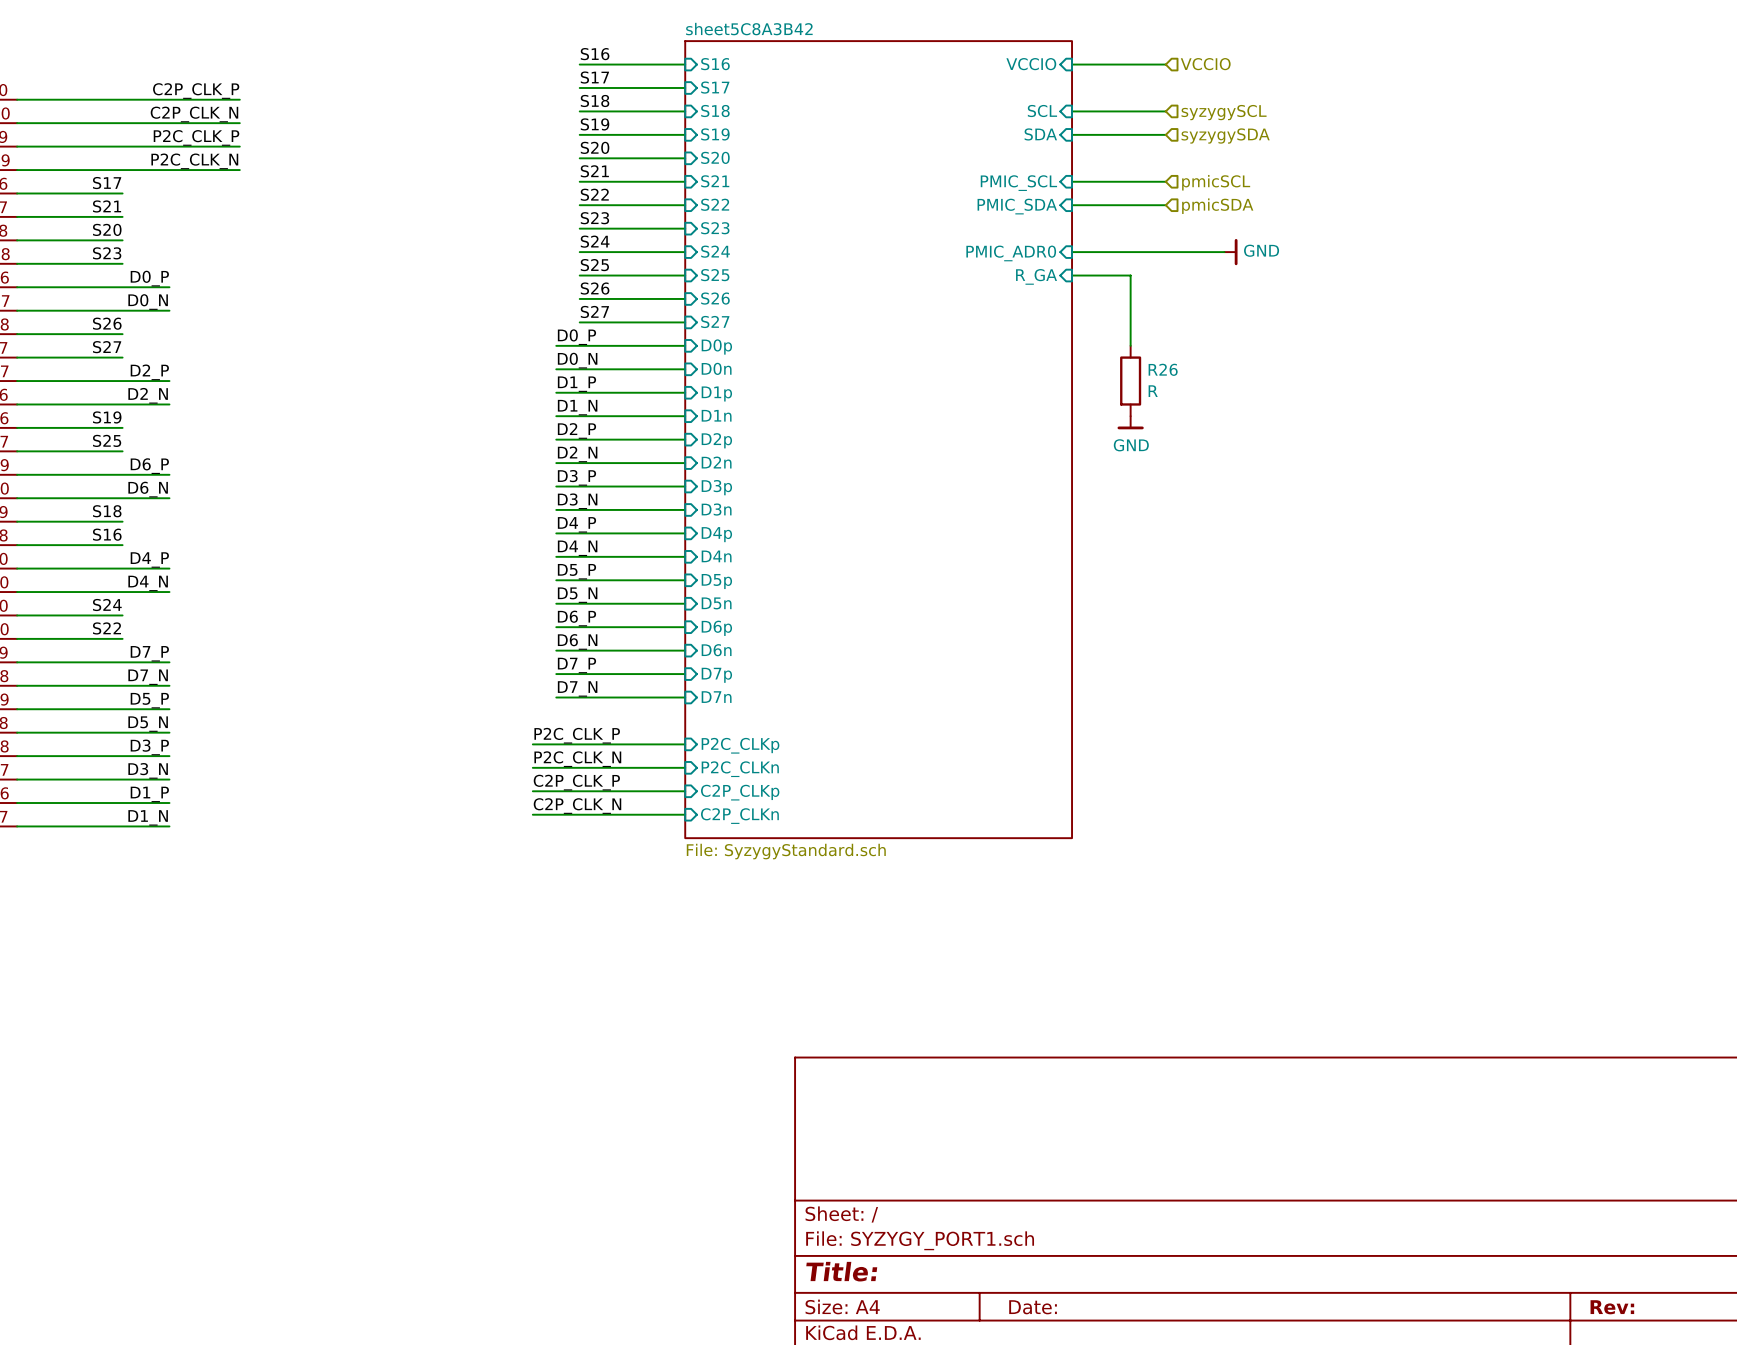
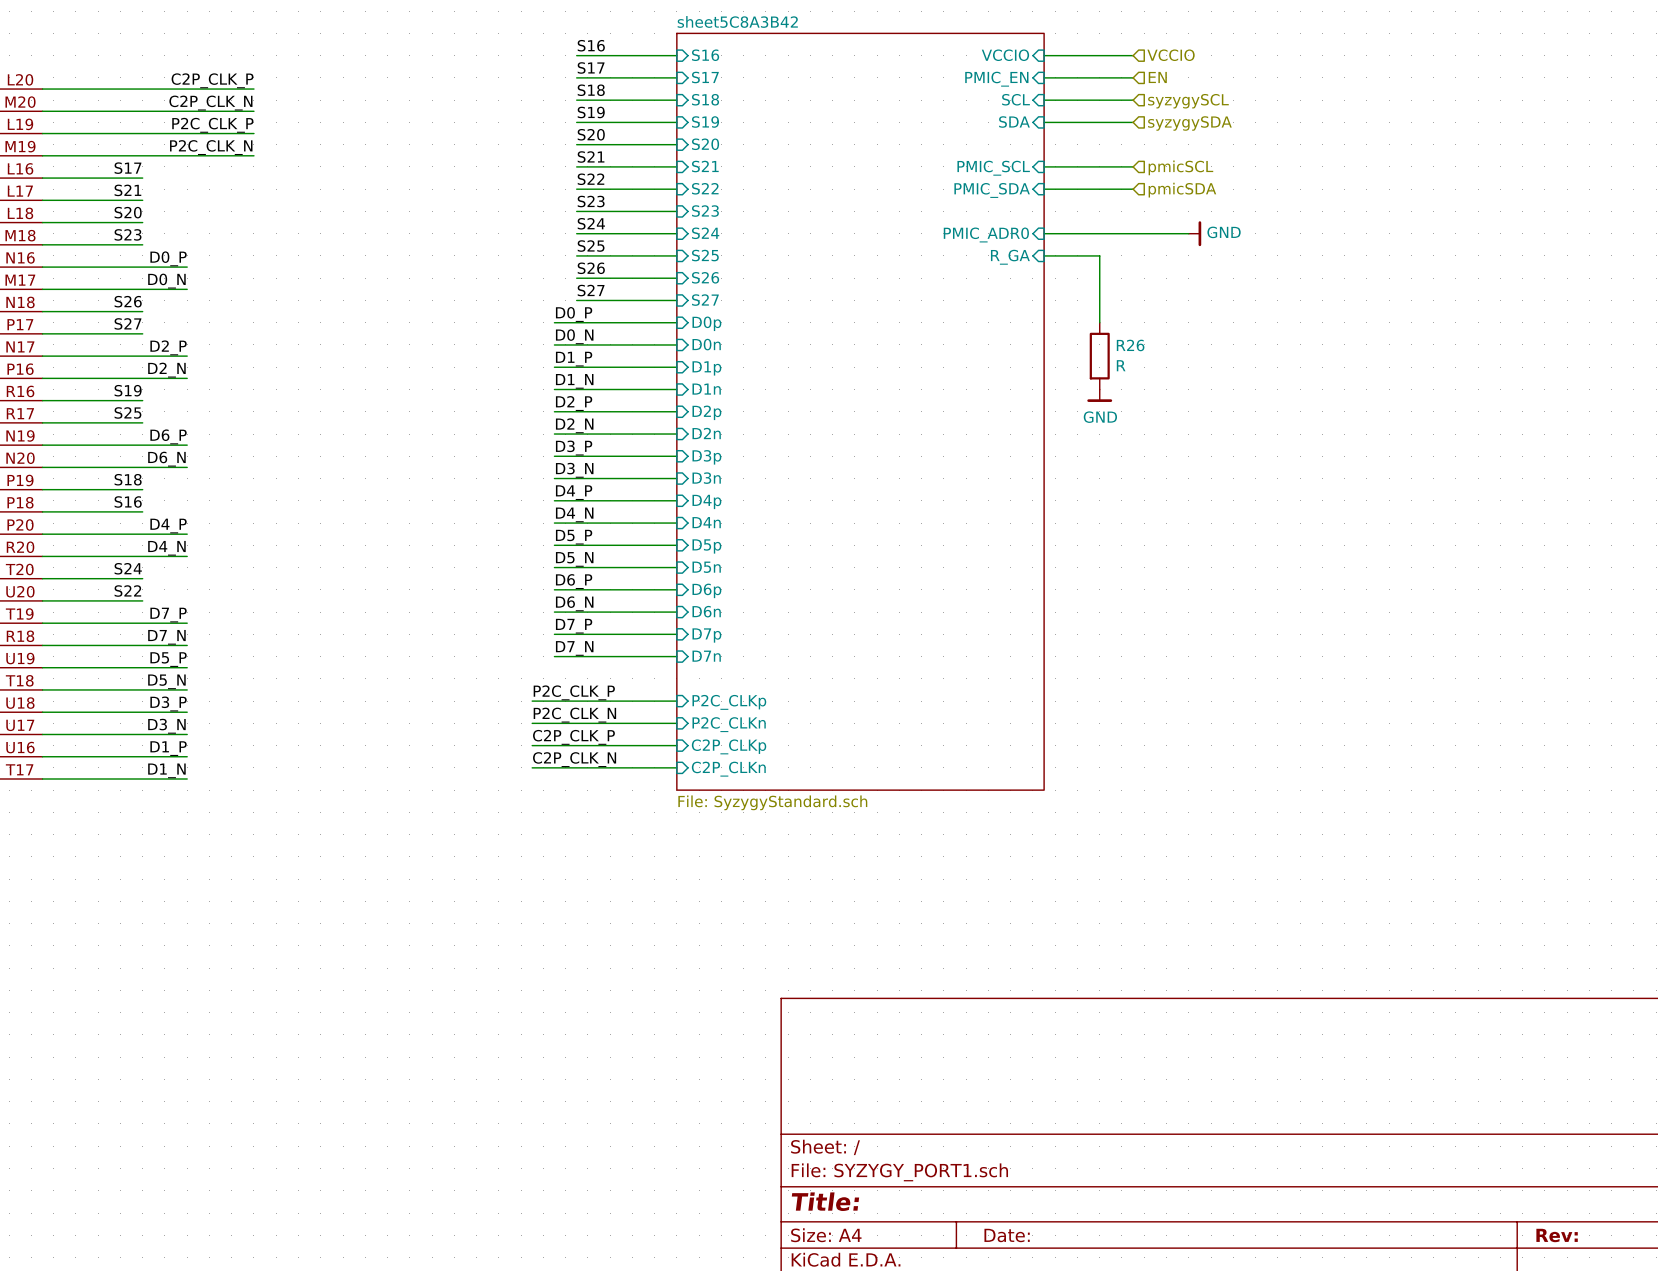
wire: none -> (1044, 77) (1133, 77)
hierarchical label: none -> EN (1157, 77)
sheet pin: none -> PMIC_EN (996, 79)

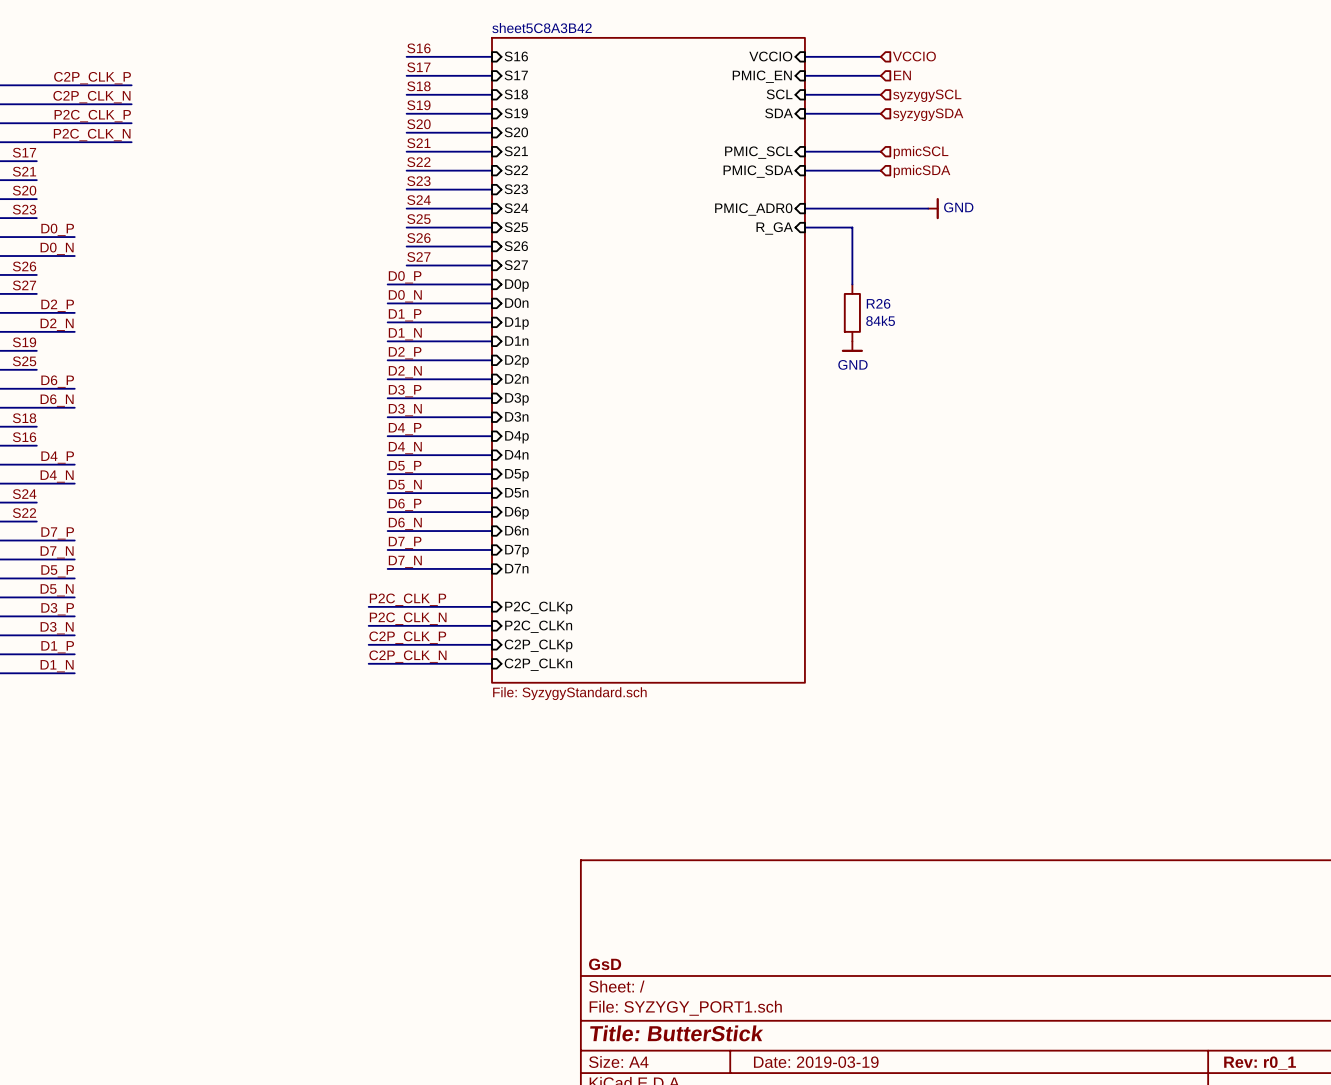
R26 value: R (1121, 365) -> 84k5 (880, 320)
title block: none -> GsD (605, 964)
title block: Title: (825, 1201) -> Title: ButterStick (676, 1033)
title block: Date: (1007, 1235) -> Date: 2019-03-19 (816, 1062)
title block: Rev: (1557, 1235) -> Rev: r0_1 (1260, 1063)

